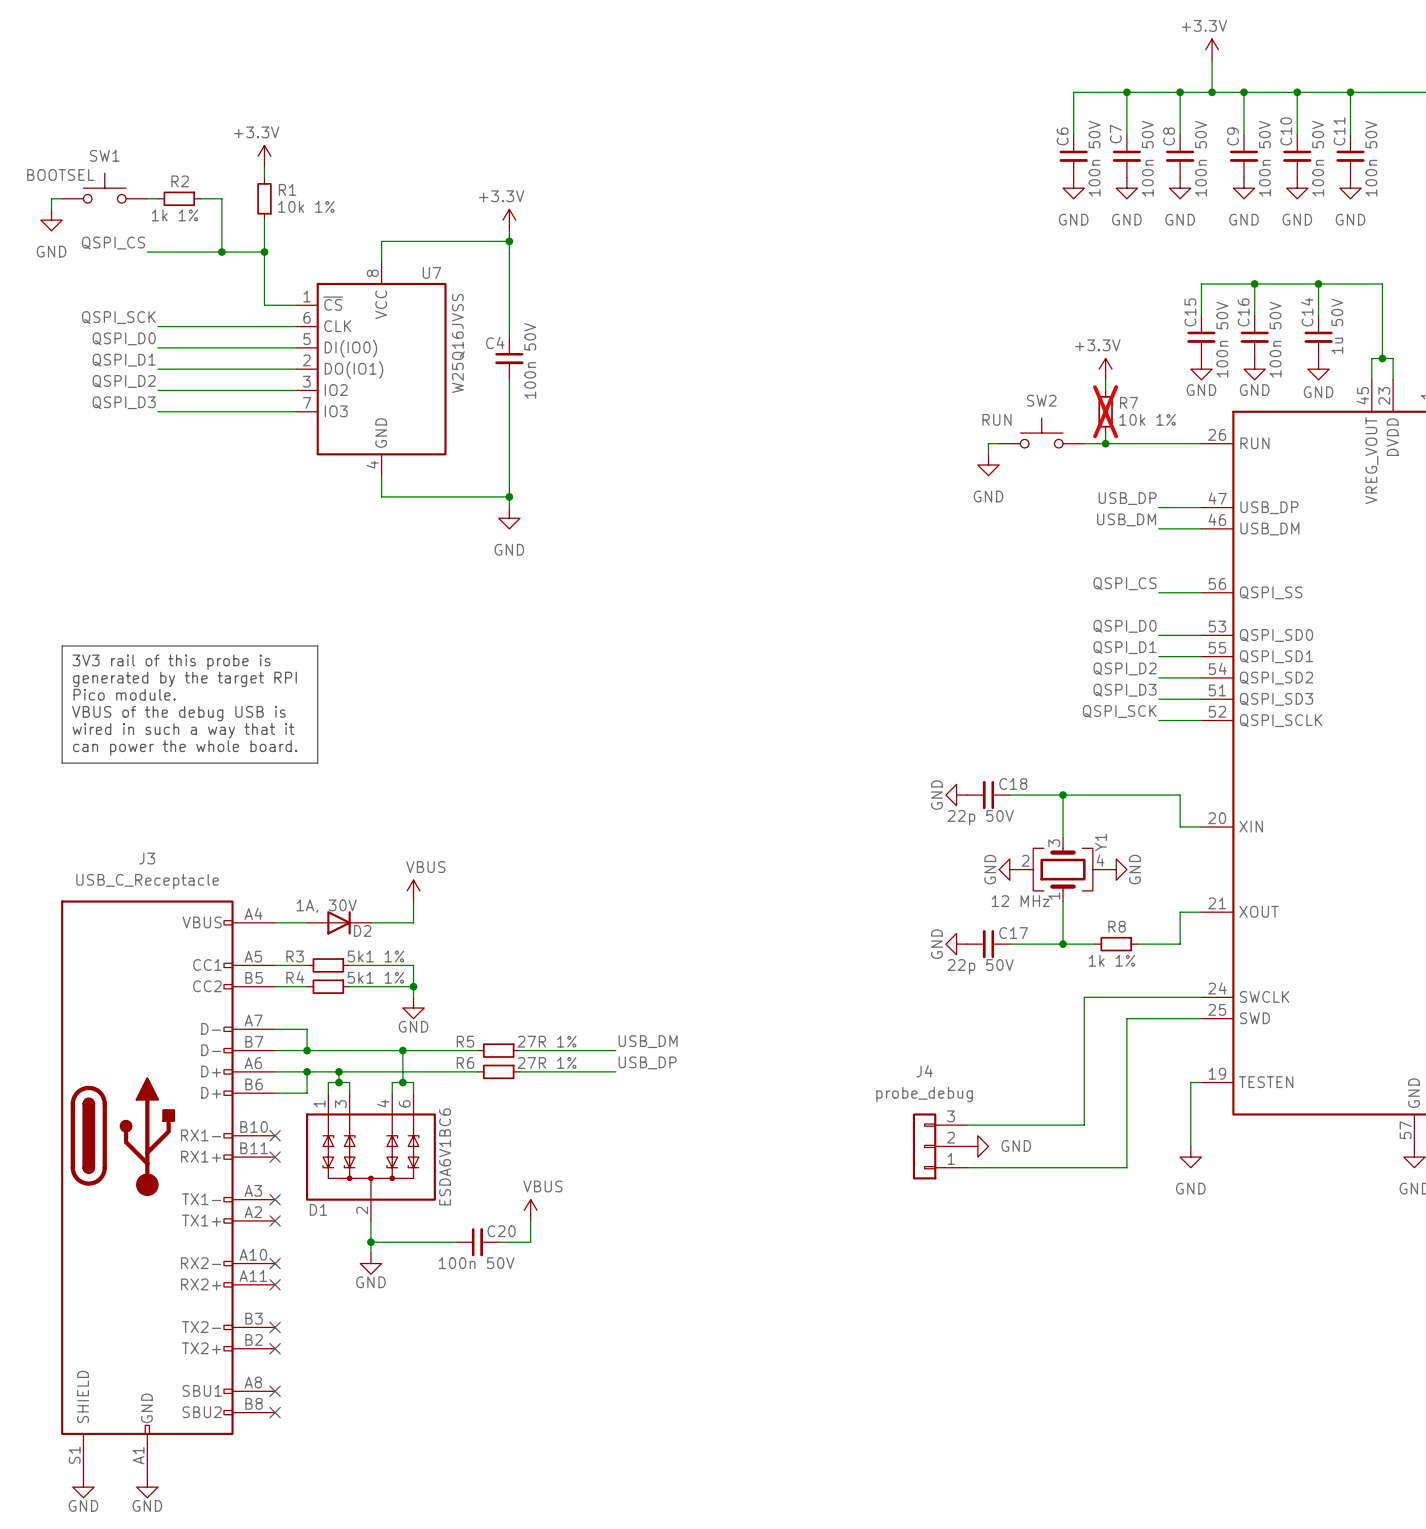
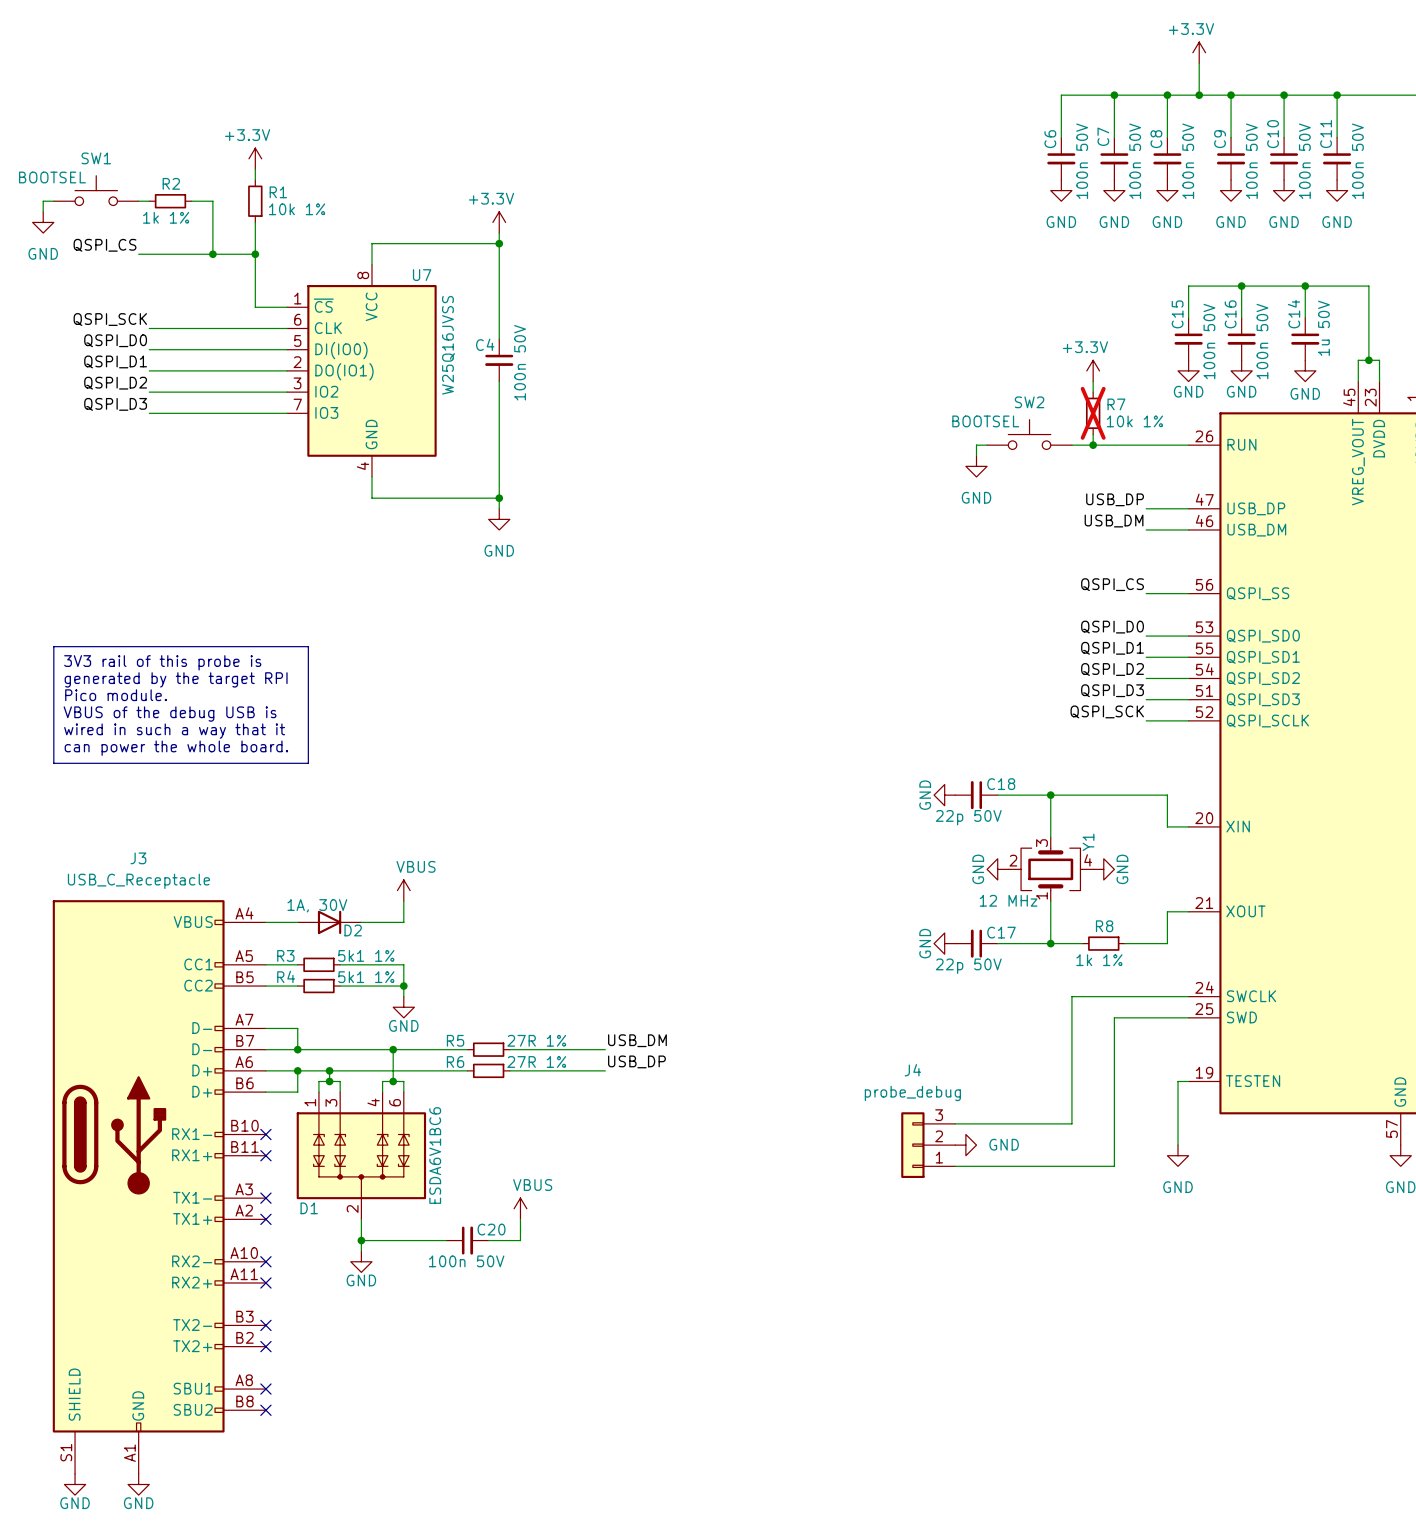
SW2 value: RUN (997, 419) -> BOOTSEL (985, 421)

